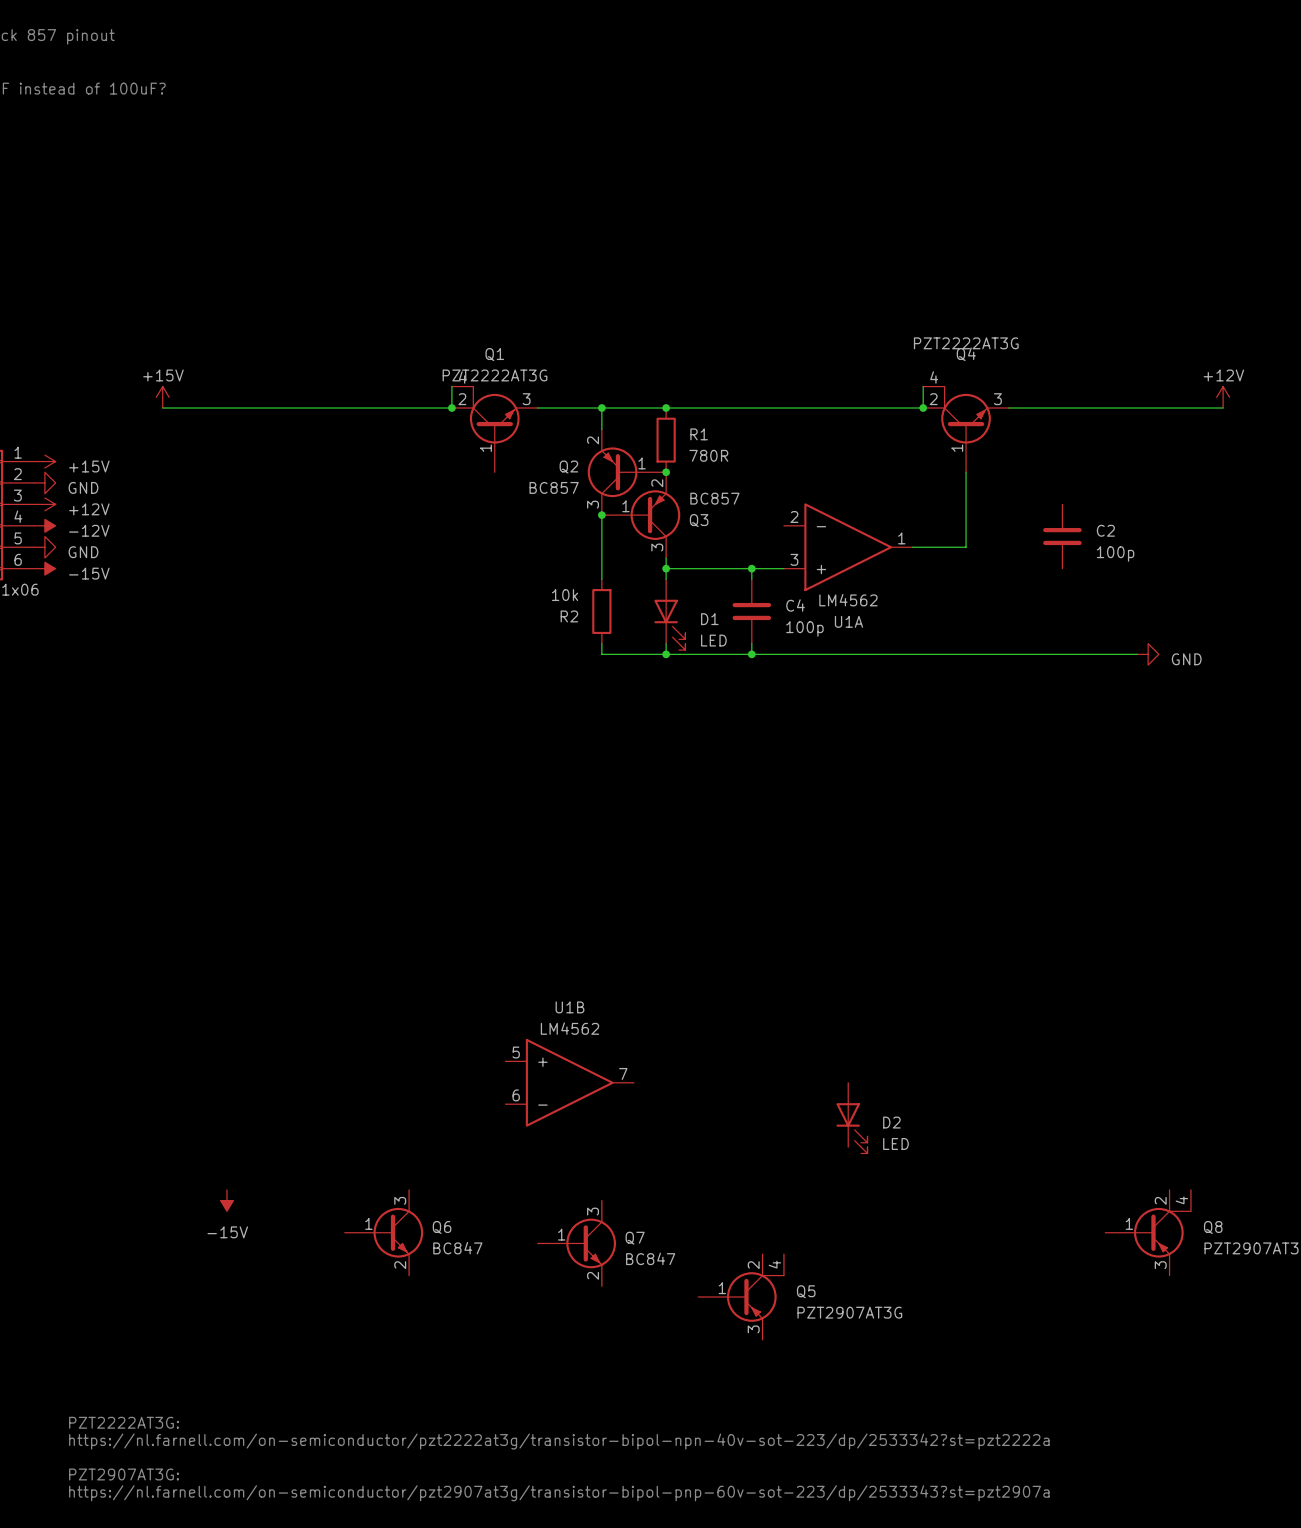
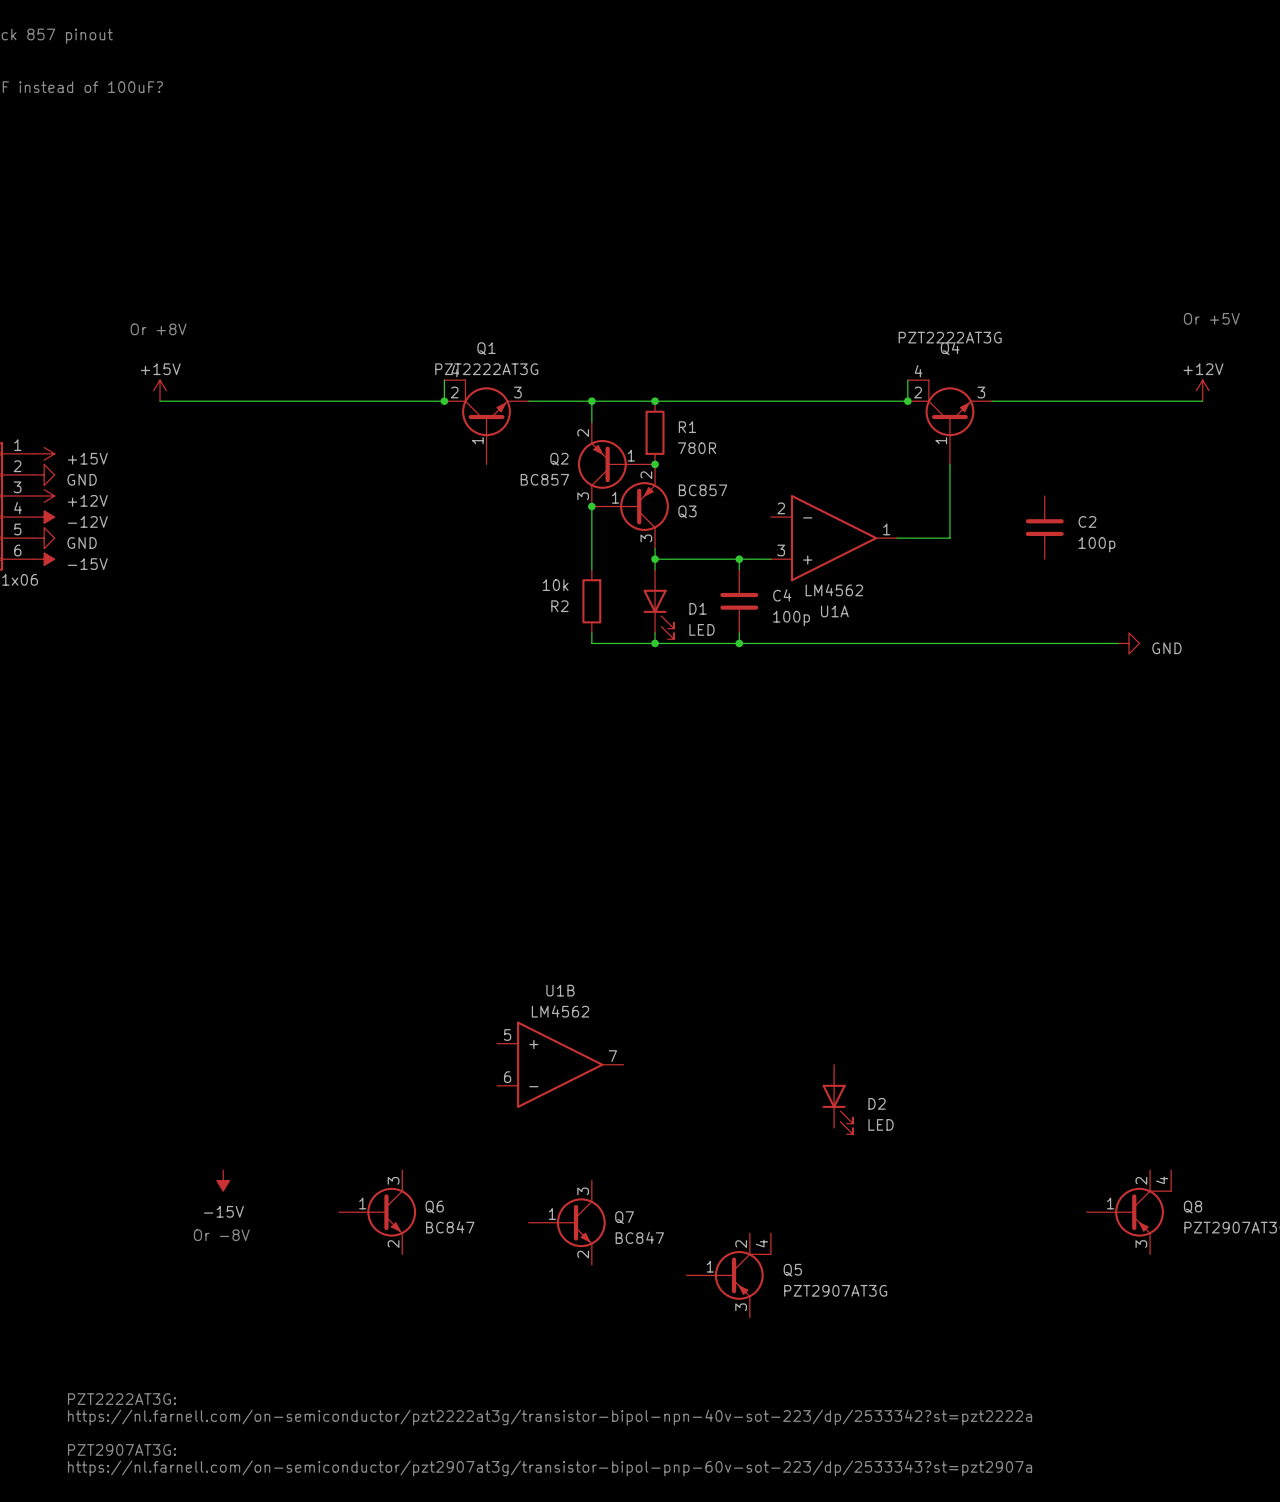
text: none -> Or +5V (1211, 318)
text: none -> Or +8V (158, 329)
text: none -> Or -8V (221, 1235)

